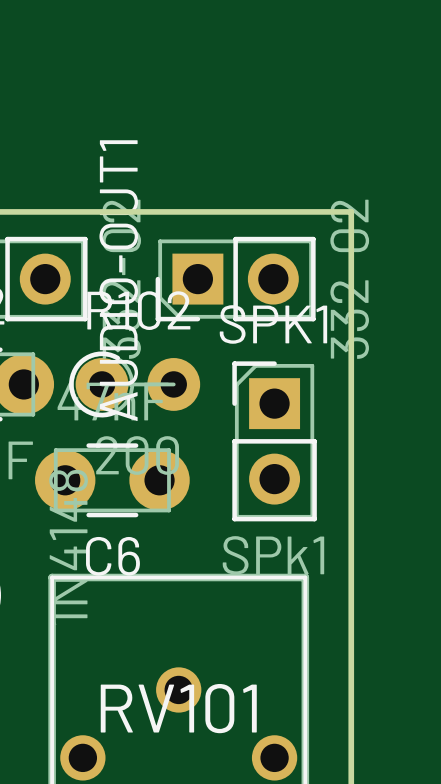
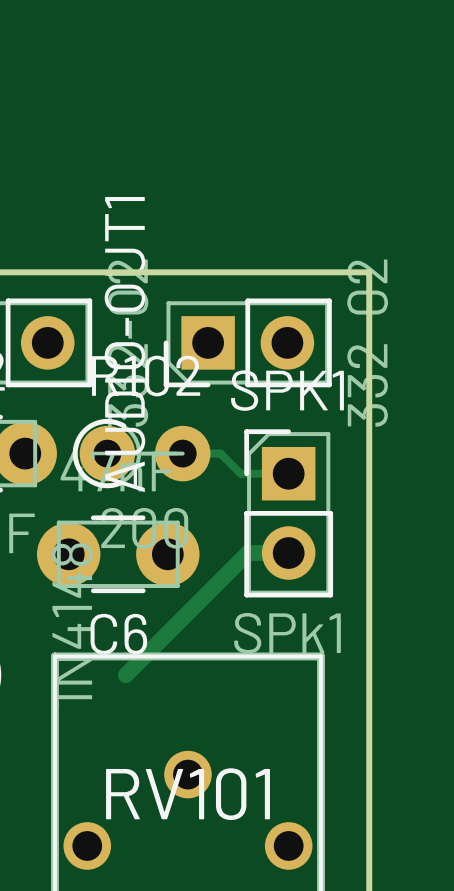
track: none -> (182, 453) (220, 453) (240, 473) (288, 473)
track: none -> (288, 553) (247, 553) (125, 675)

